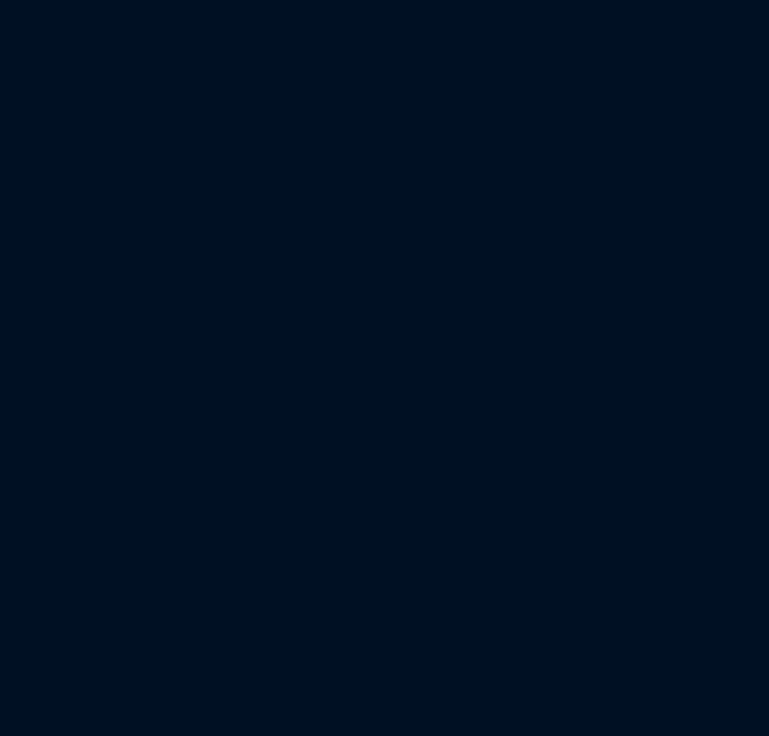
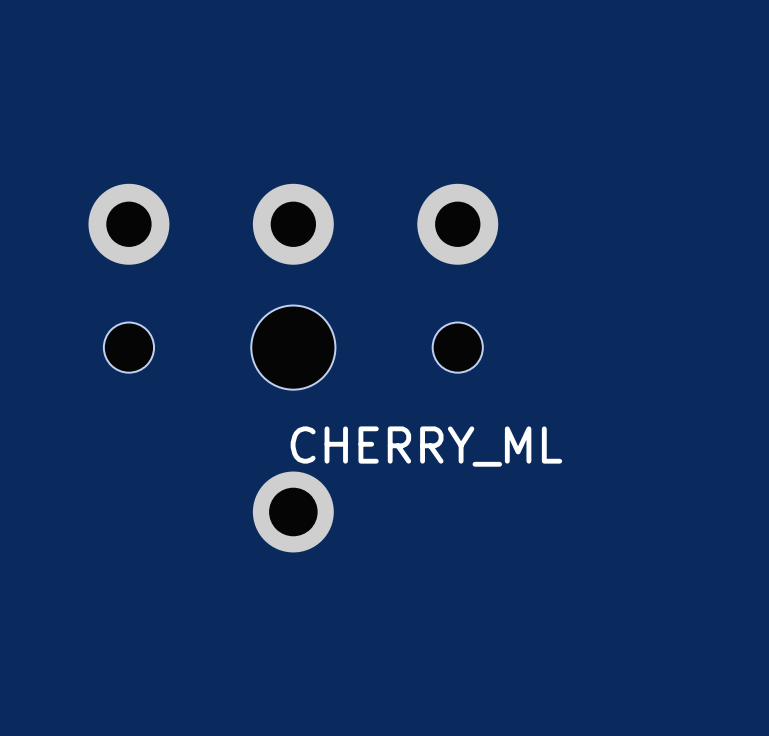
part: none -> CHERRY_ML (293, 368)

